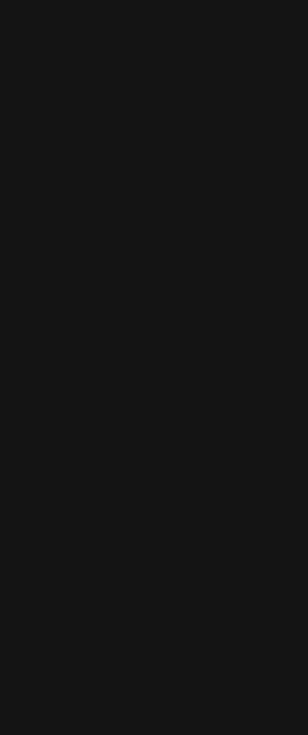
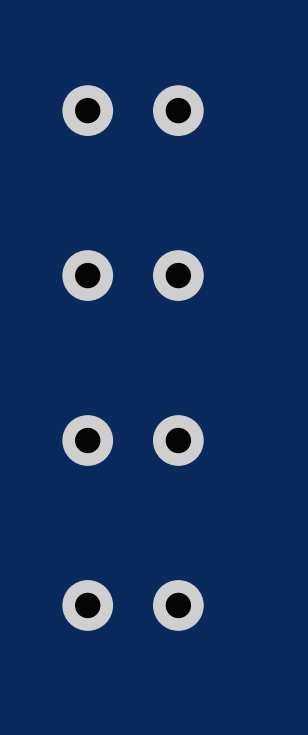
part: none -> (133, 110)
part: none -> (133, 275)
part: none -> (133, 440)
part: none -> (133, 605)

